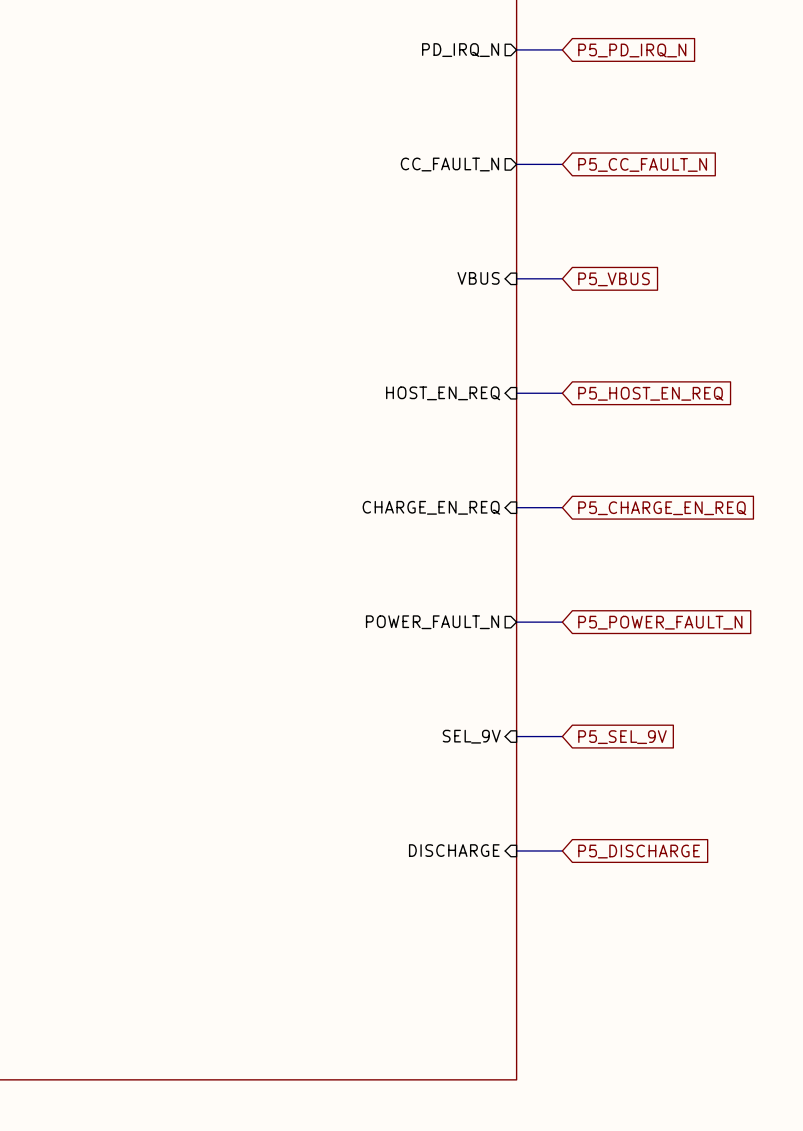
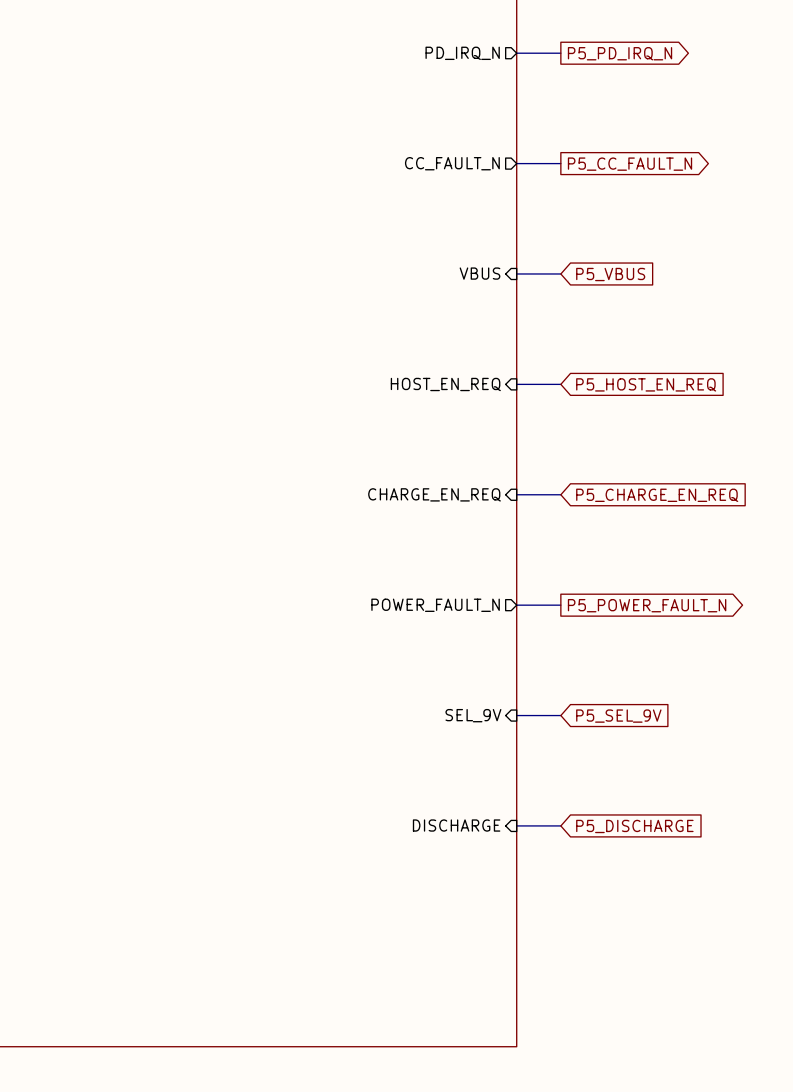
global label shape: input (632, 50) -> output (620, 53)
global label shape: input (642, 164) -> output (630, 164)
global label shape: input (660, 622) -> output (647, 605)

